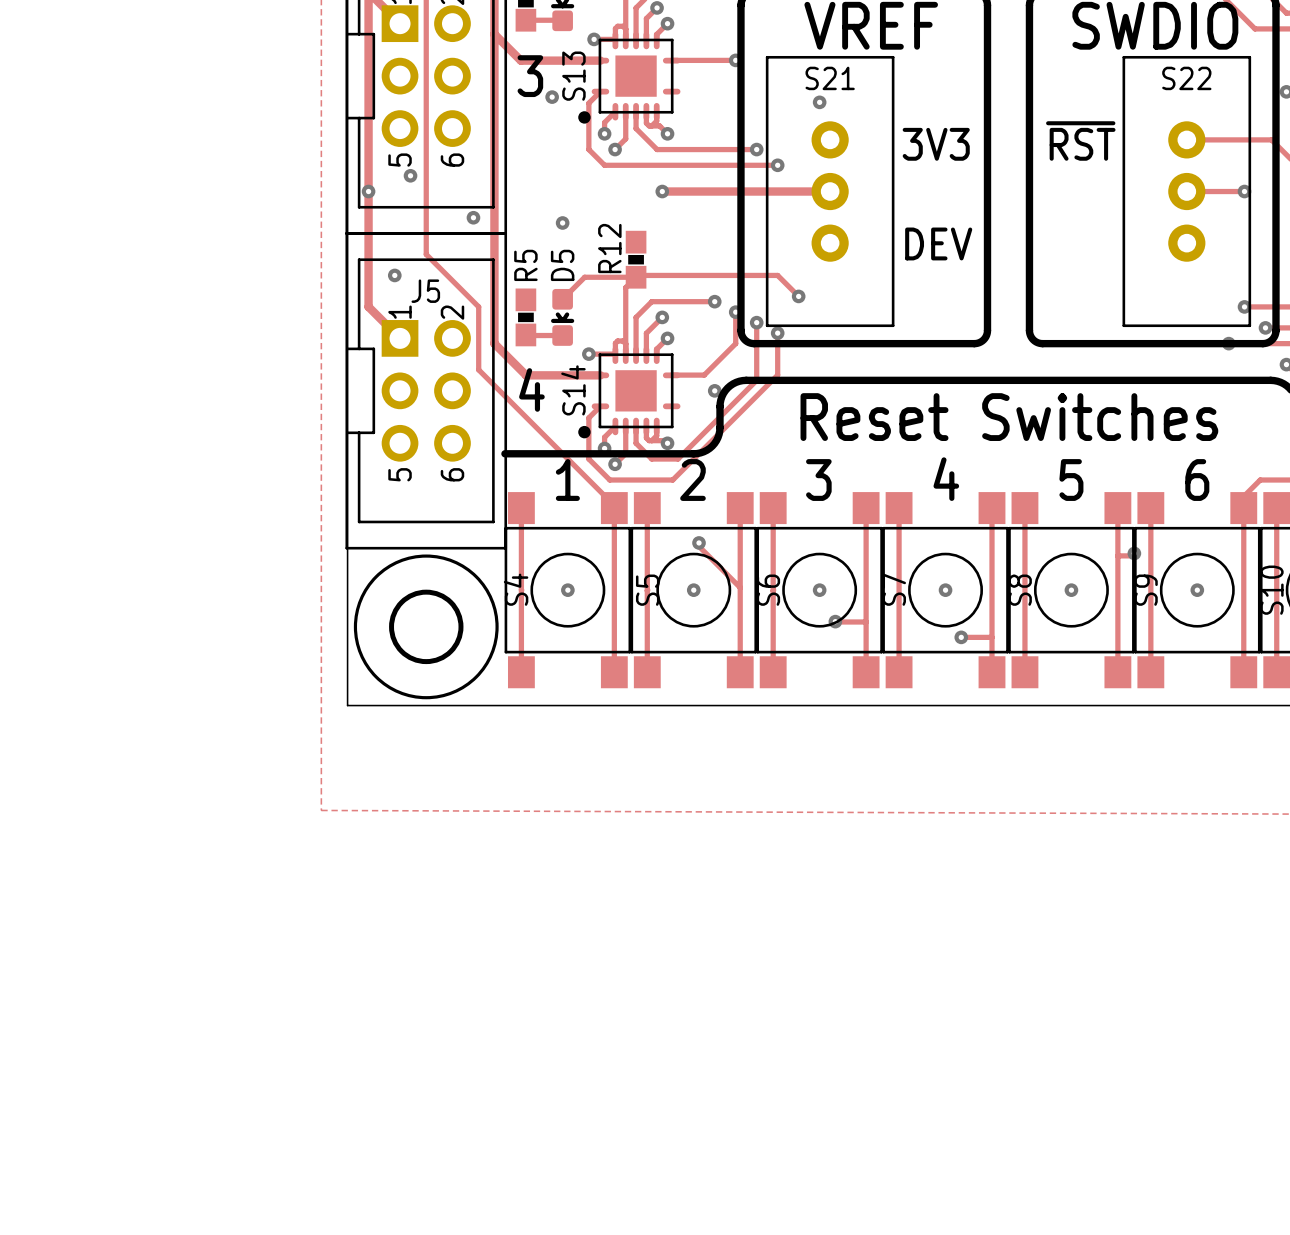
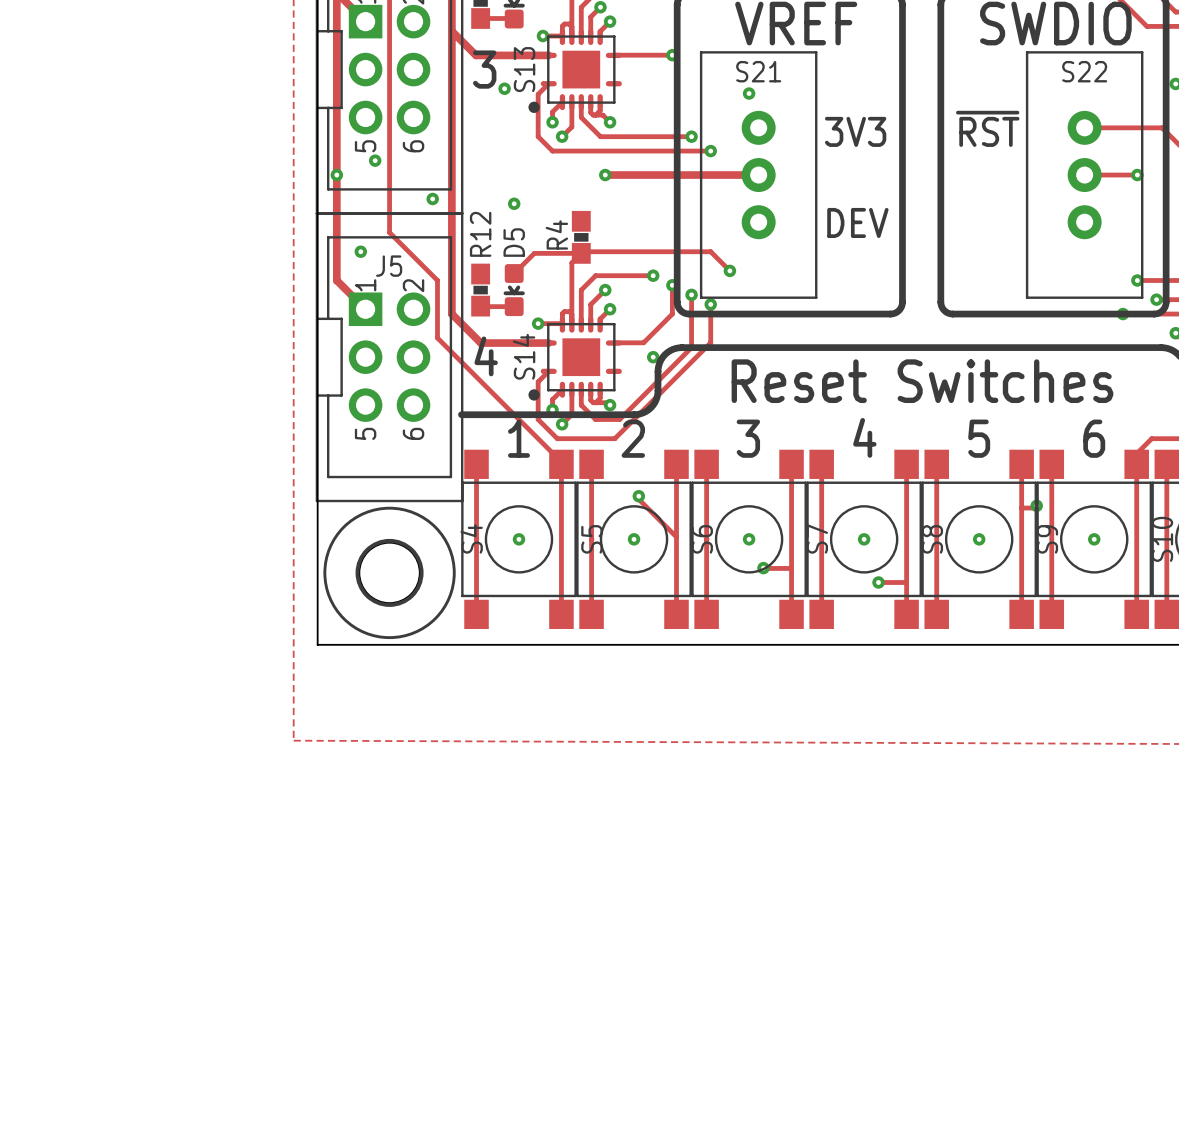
R12 name: R12 (609, 248) -> R4 (556, 234)
R5 name: R5 (525, 265) -> R12 (480, 234)

